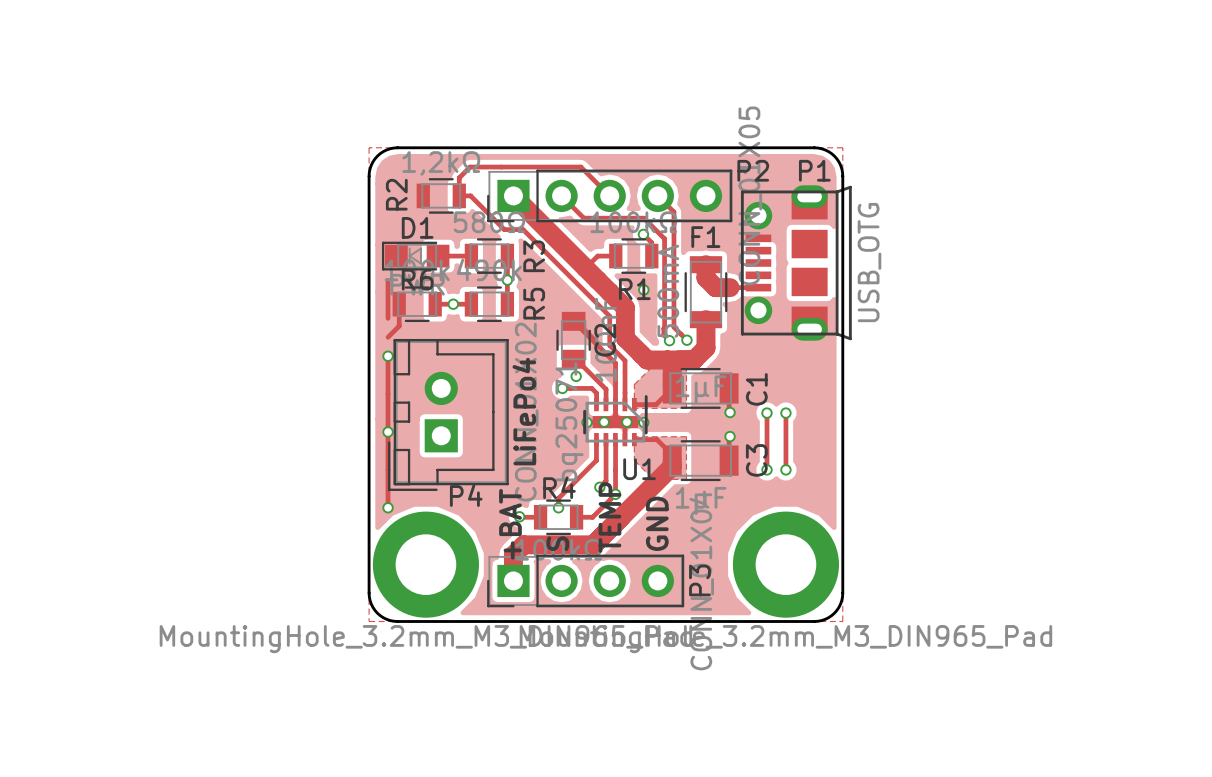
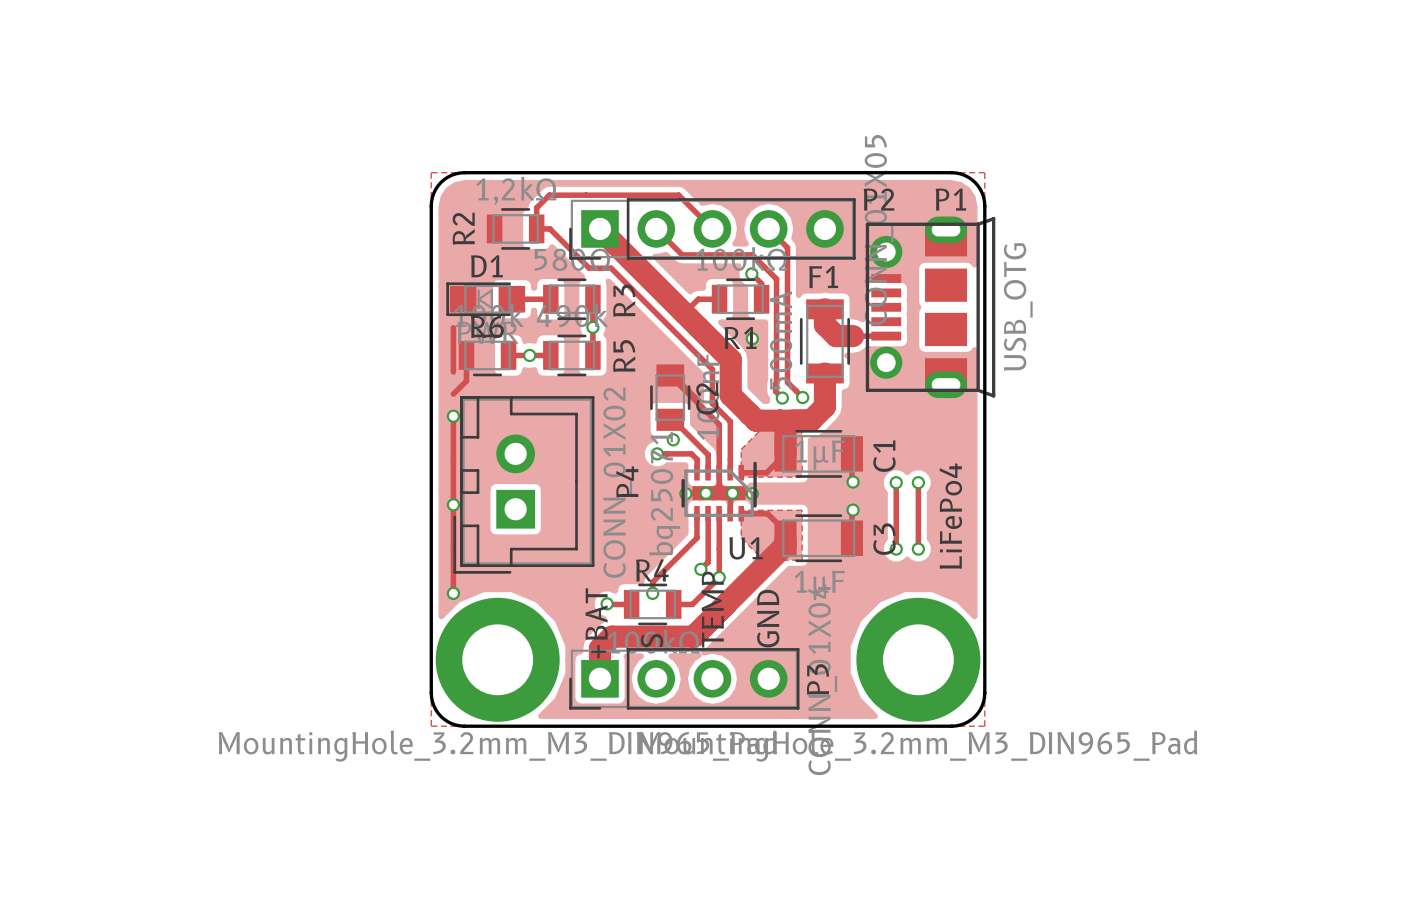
text position: LiFePo4 (524, 411) -> LiFePo4 (950, 516)
P4 name rotation: 0° (466, 495) -> 90° counterclockwise (627, 481)
P4 name position: P4 (466, 495) -> P4 (627, 481)

